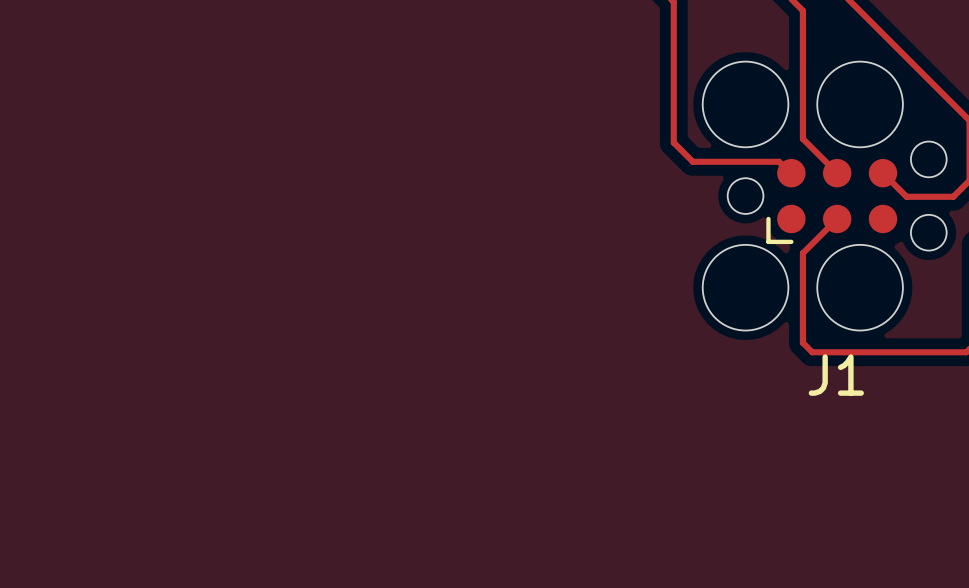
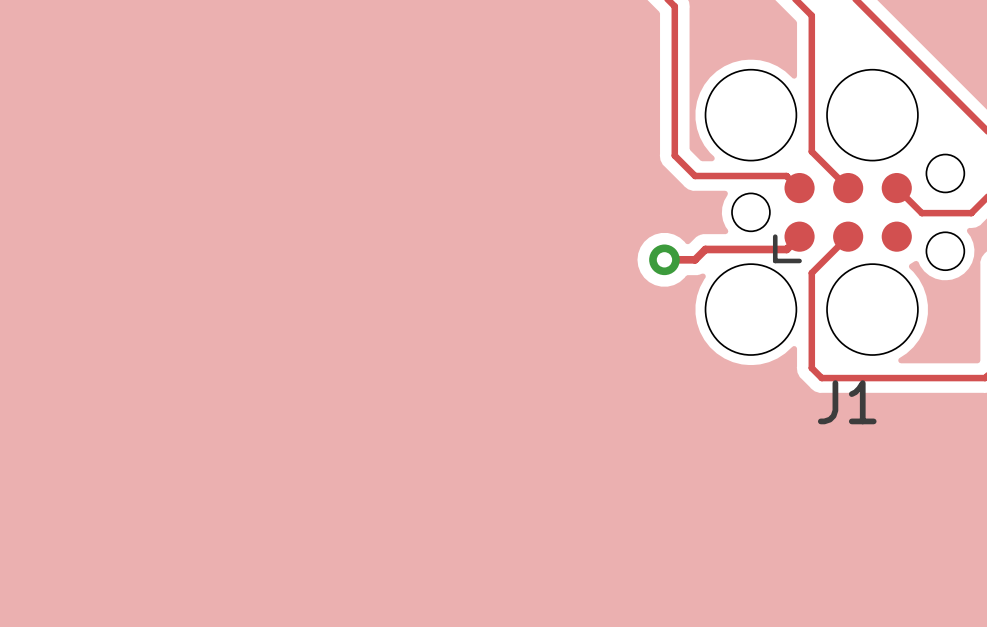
track: none -> (799, 236) (786, 249) (705, 249) (695, 259) (664, 259)
via: none -> (664, 259)

